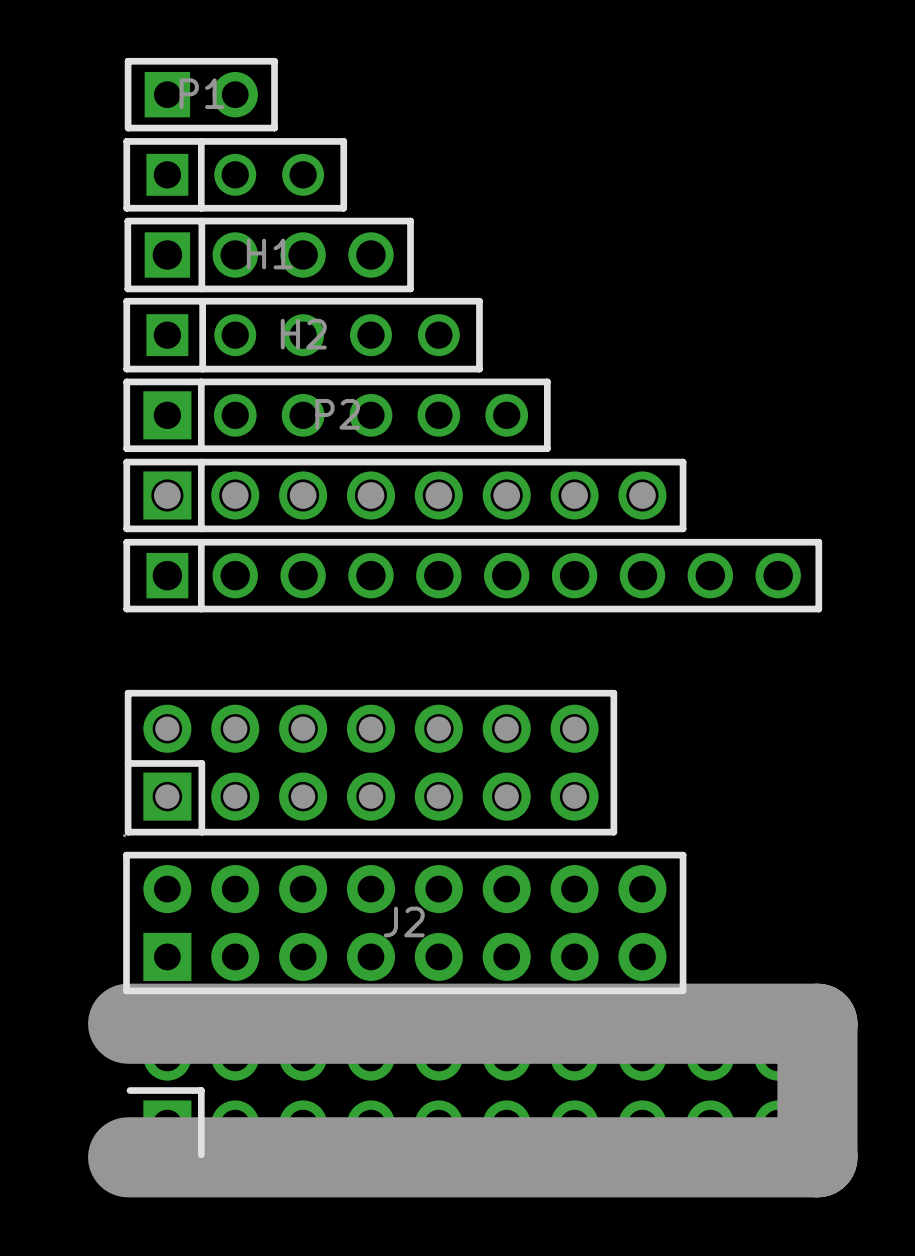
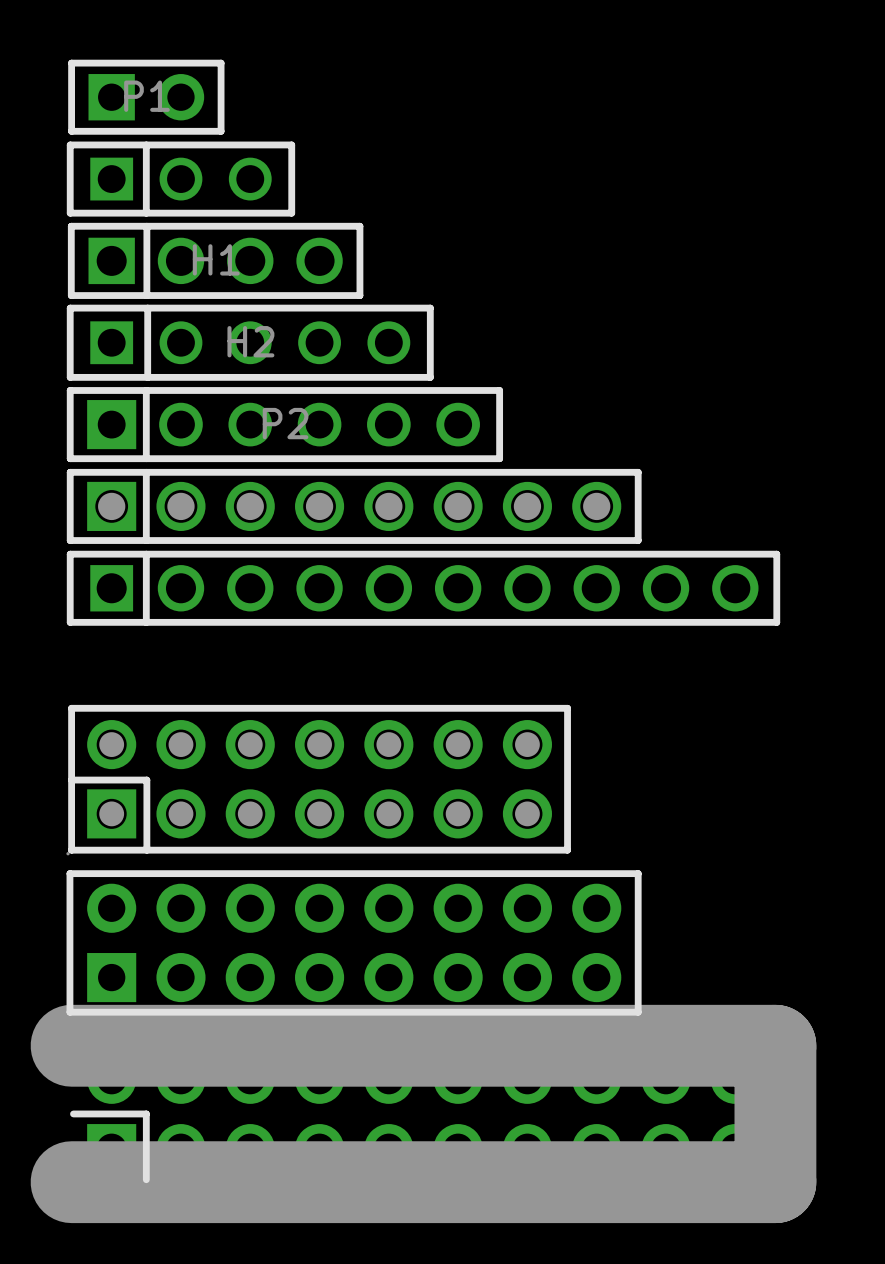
J2 name: J2 (404, 921) -> none

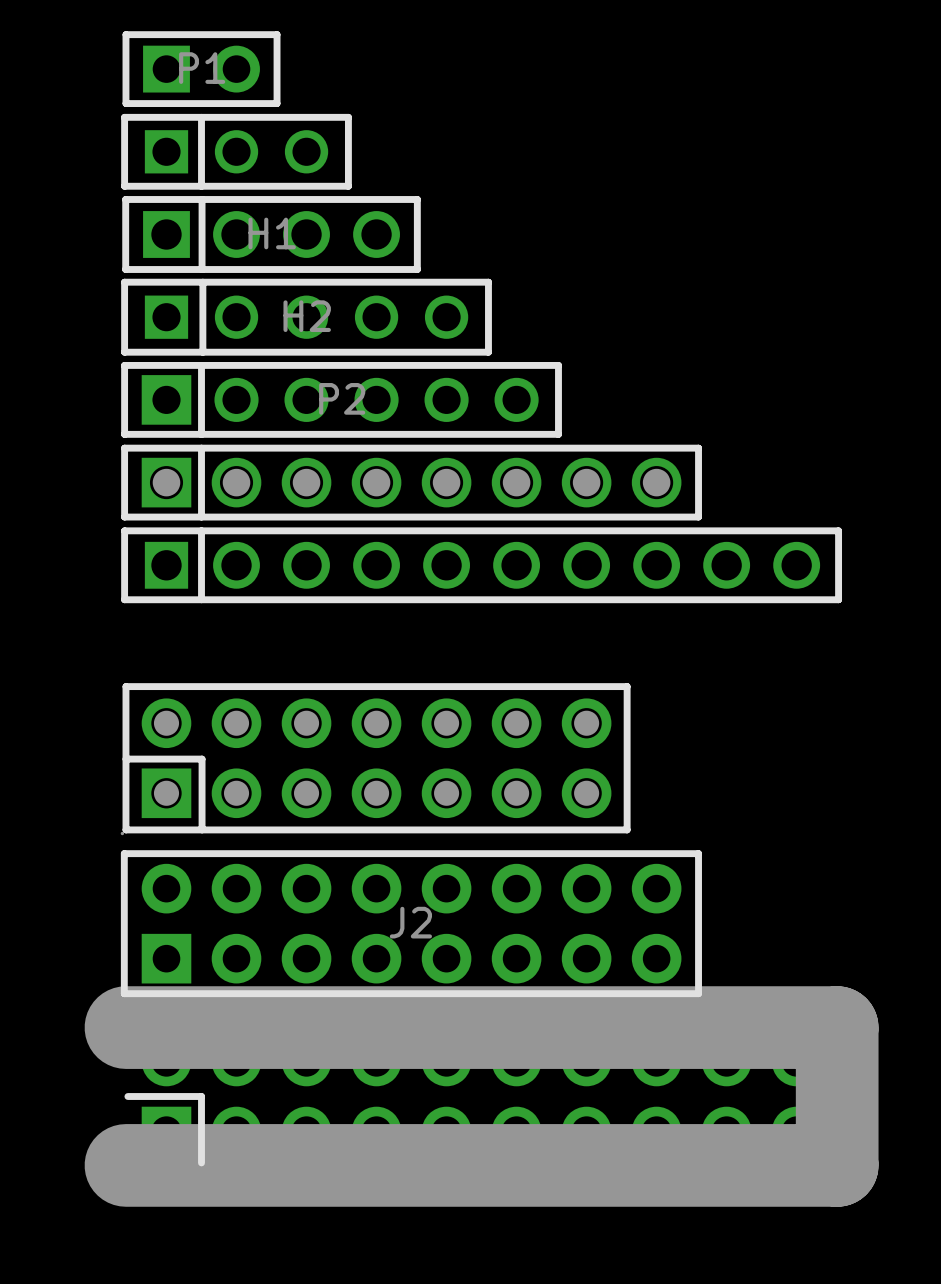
J2 name: none -> J2 (410, 922)

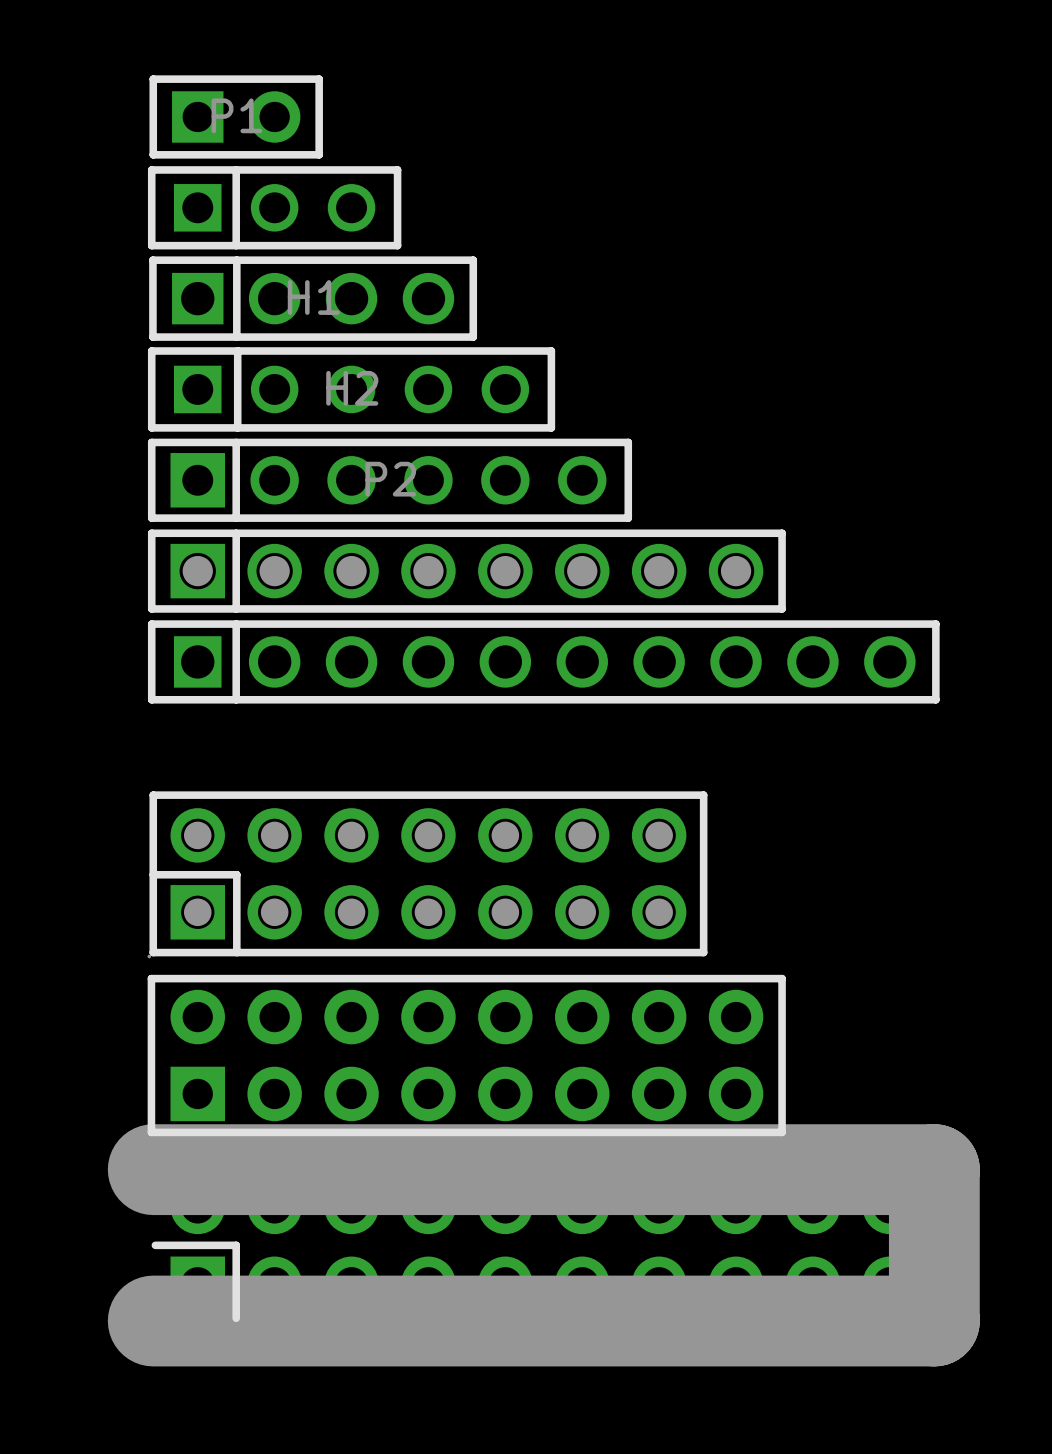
J2 name: J2 (410, 922) -> none

